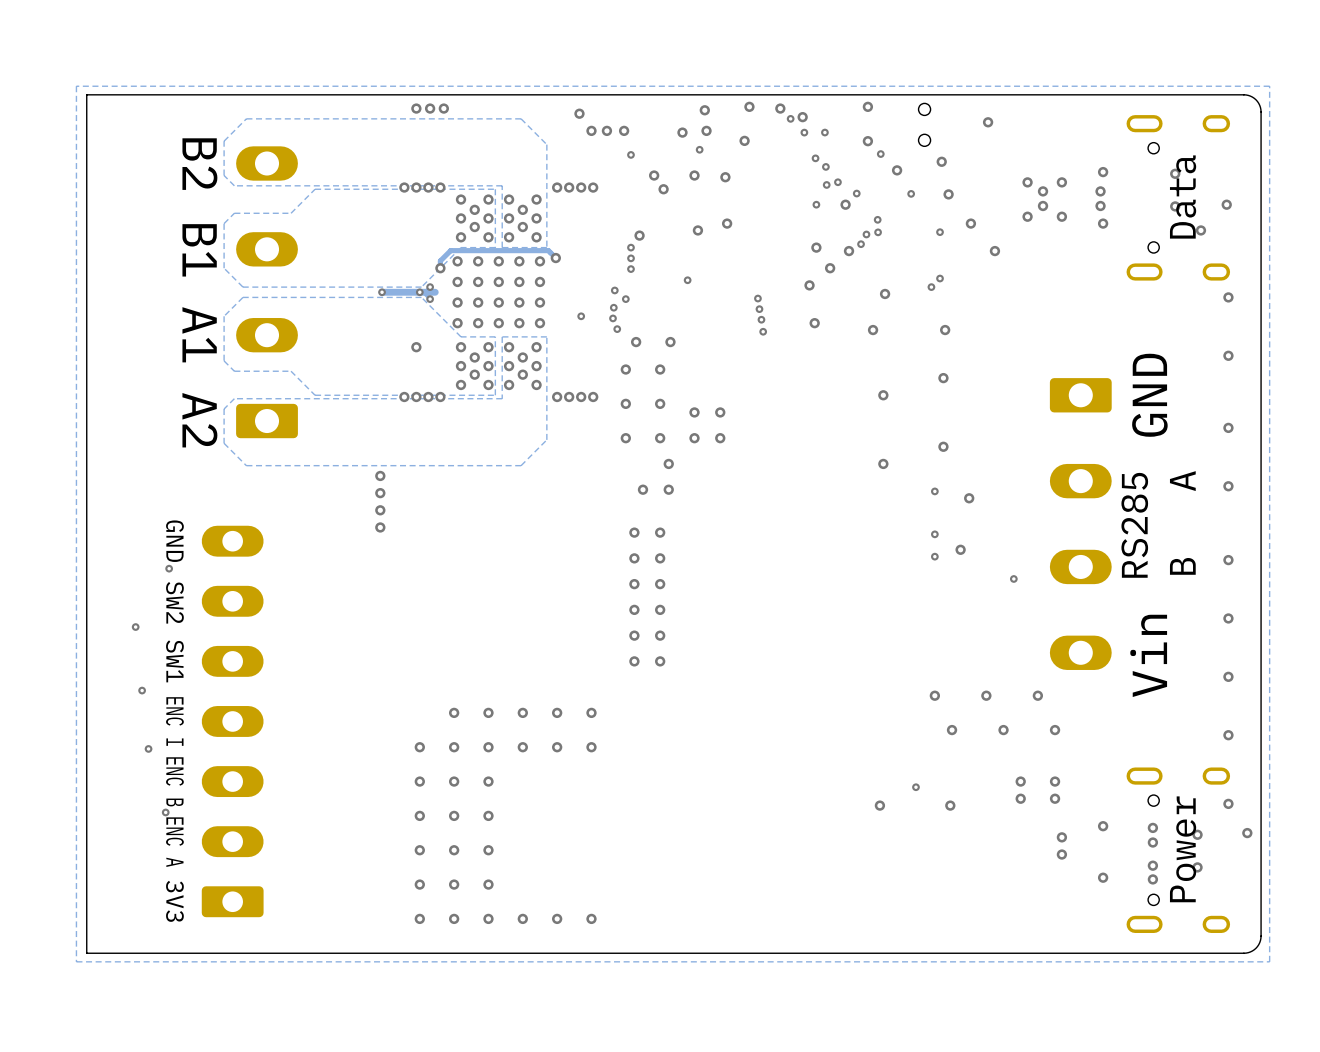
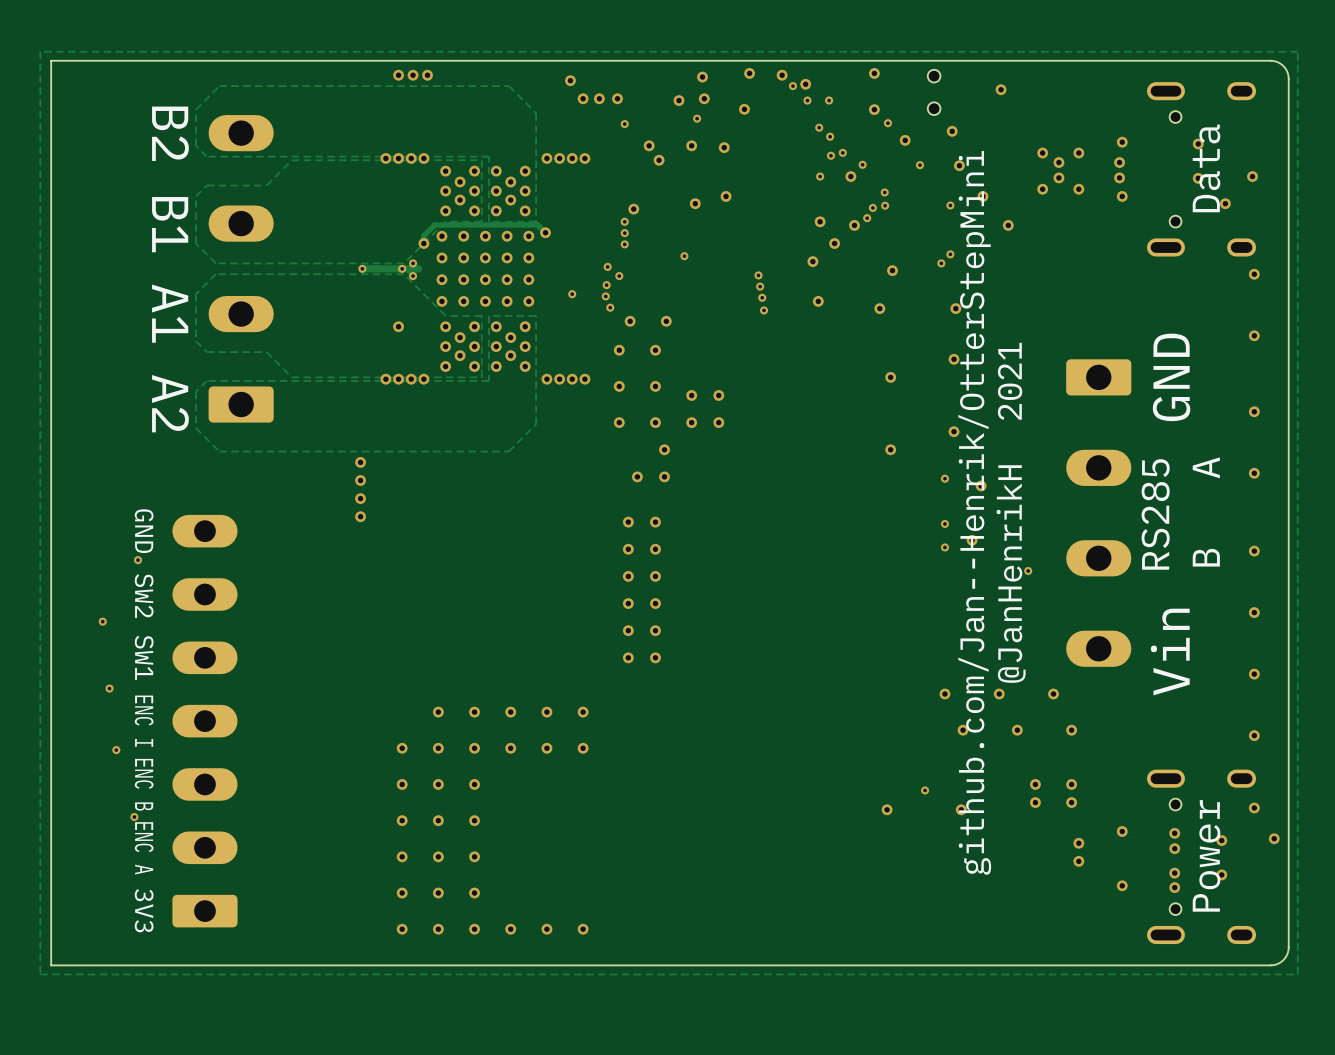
text: none -> github.com/Jan--Henrik/OtterStepMini (974, 512)
text: none -> @JanHenrikH 2021 (1011, 512)

